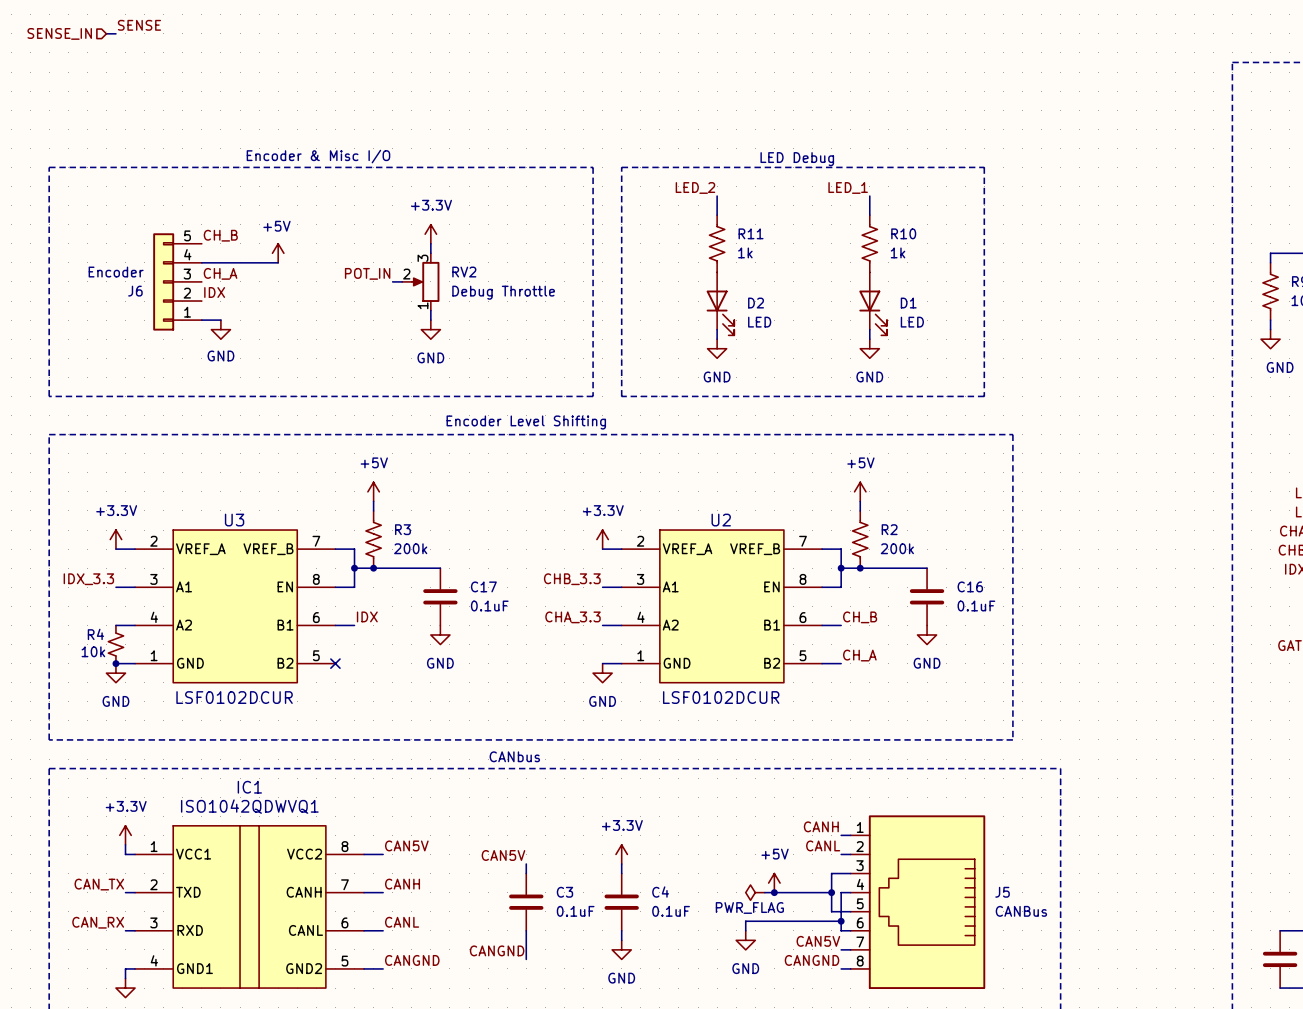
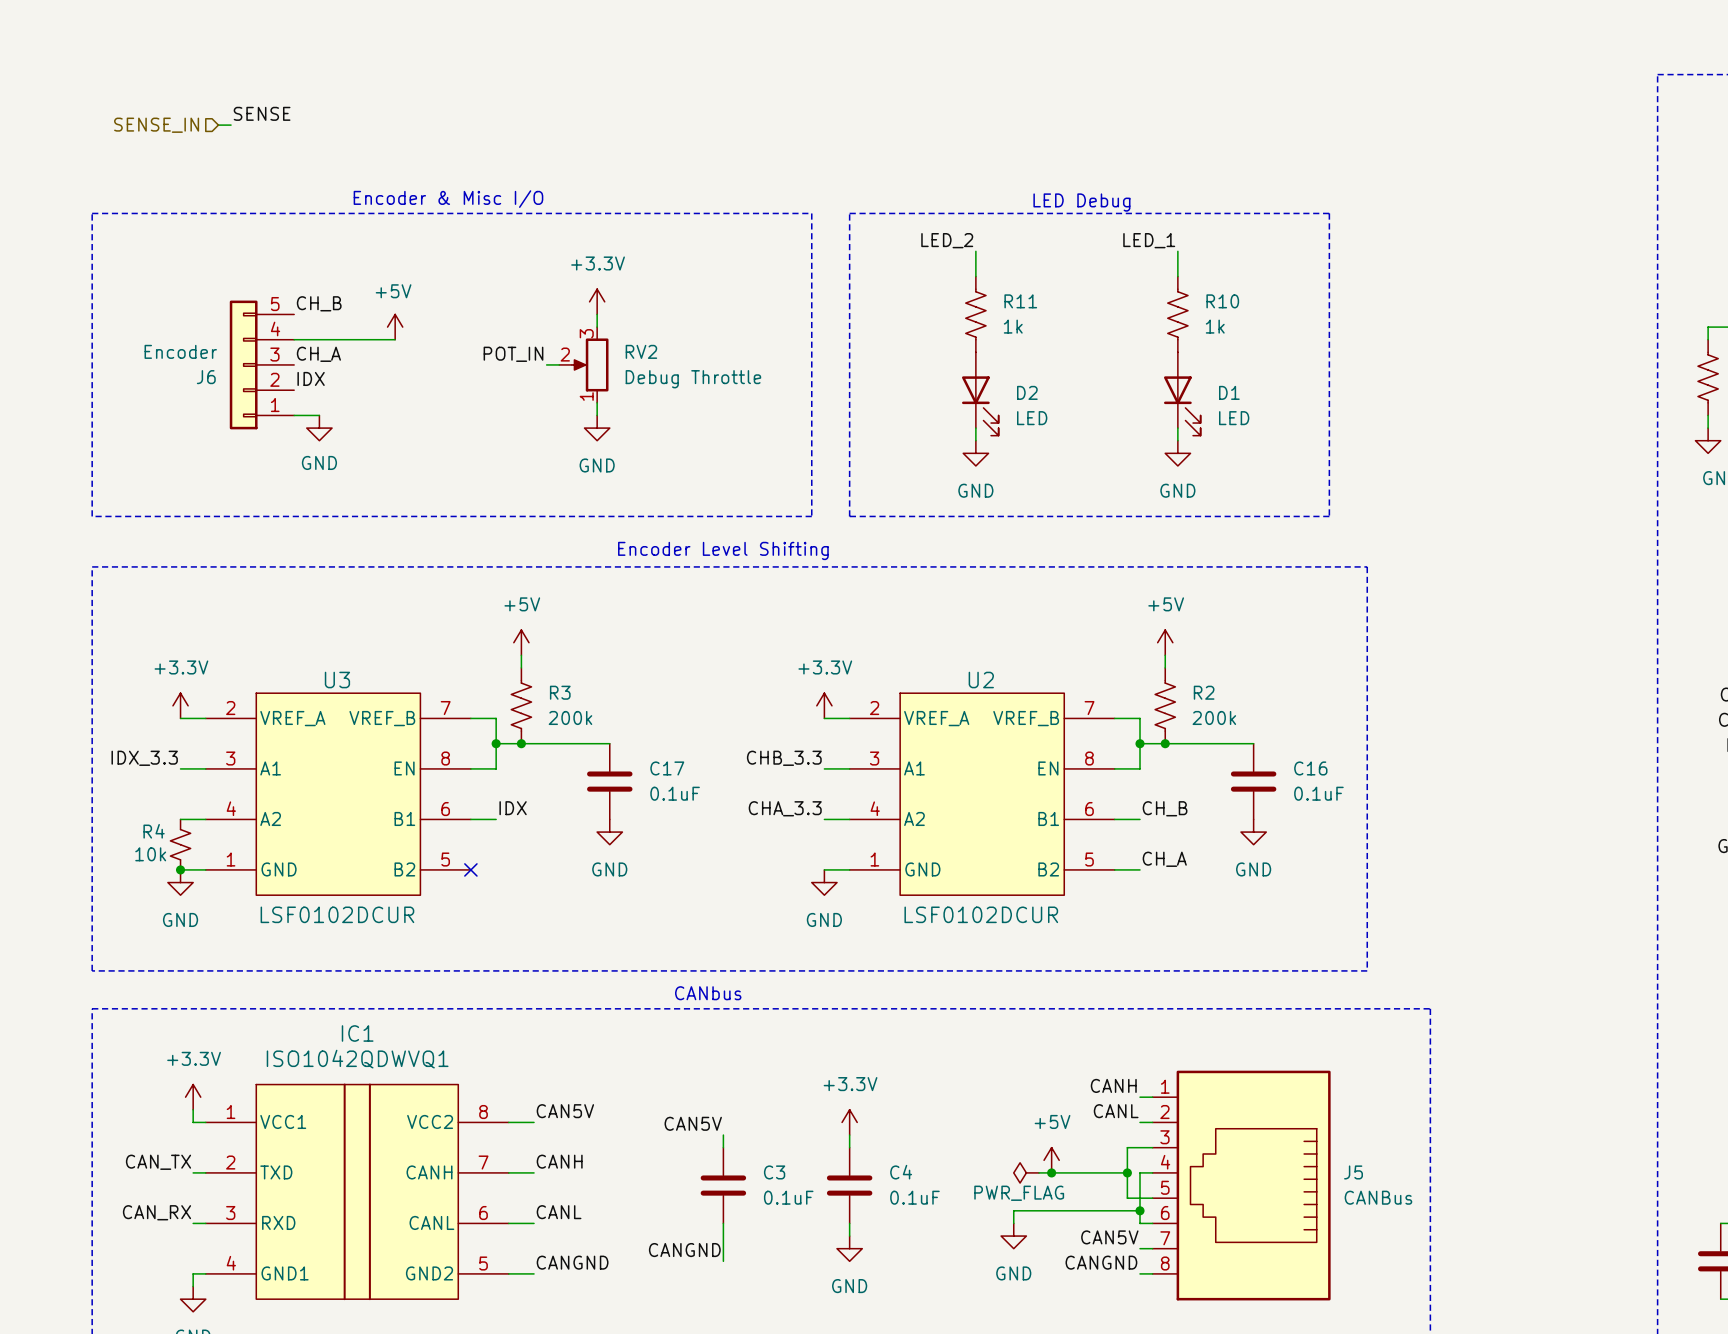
label position: SENSE (139, 25) -> SENSE (262, 113)
hierarchical label position: SENSE_IN (59, 33) -> SENSE_IN (156, 125)
wire: (106, 33) (115, 33) -> (218, 125) (231, 125)

